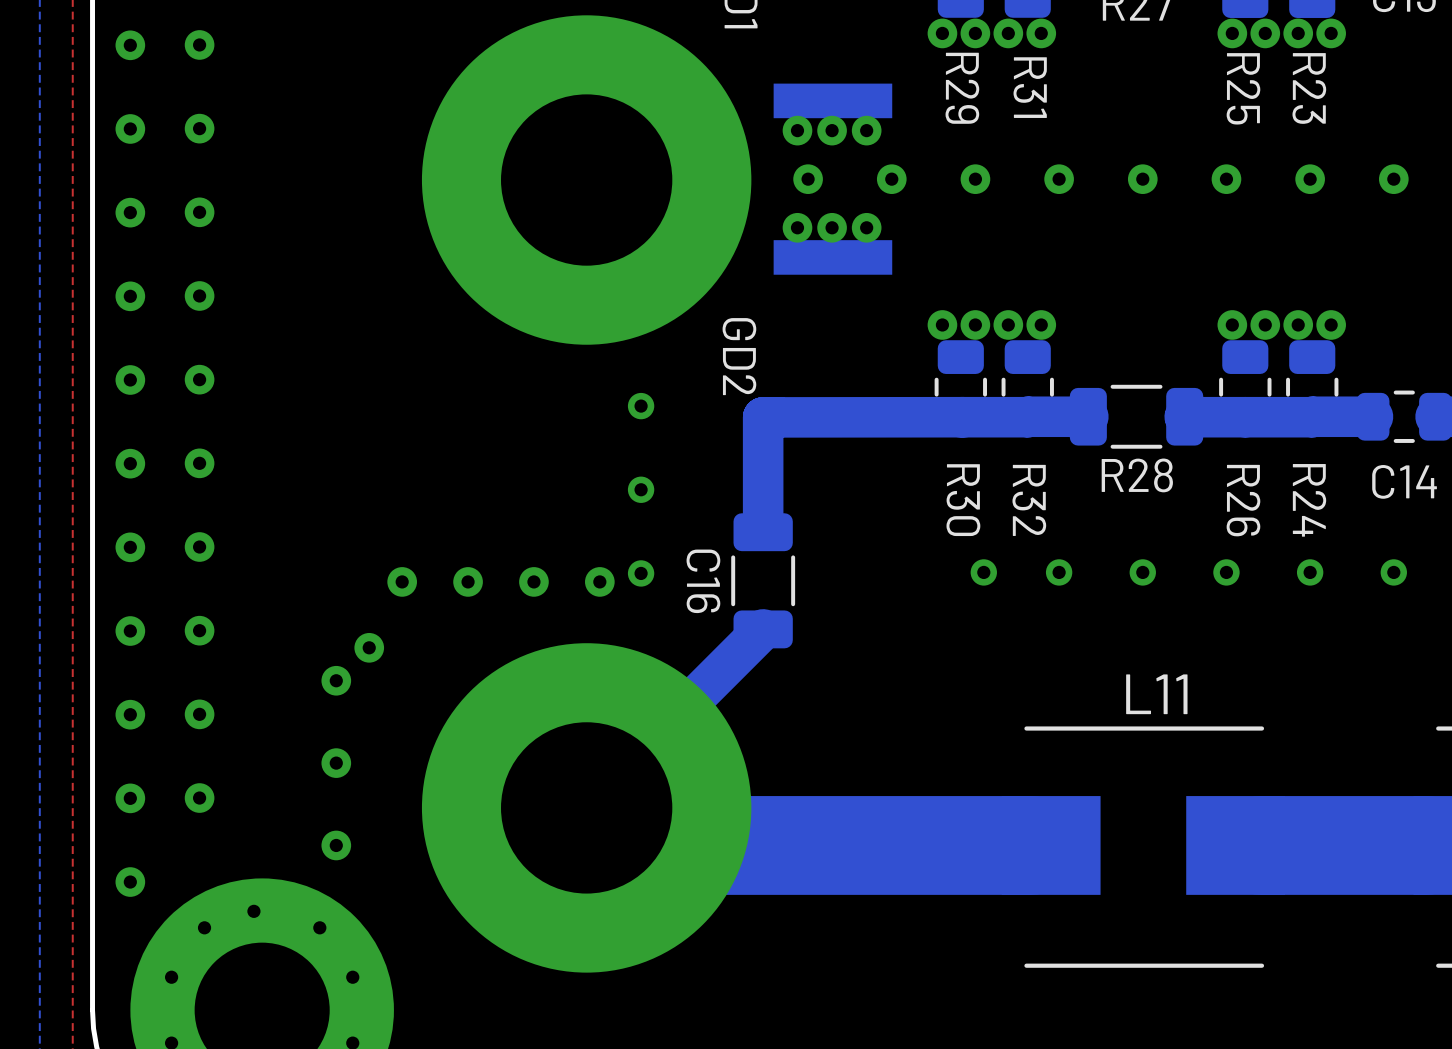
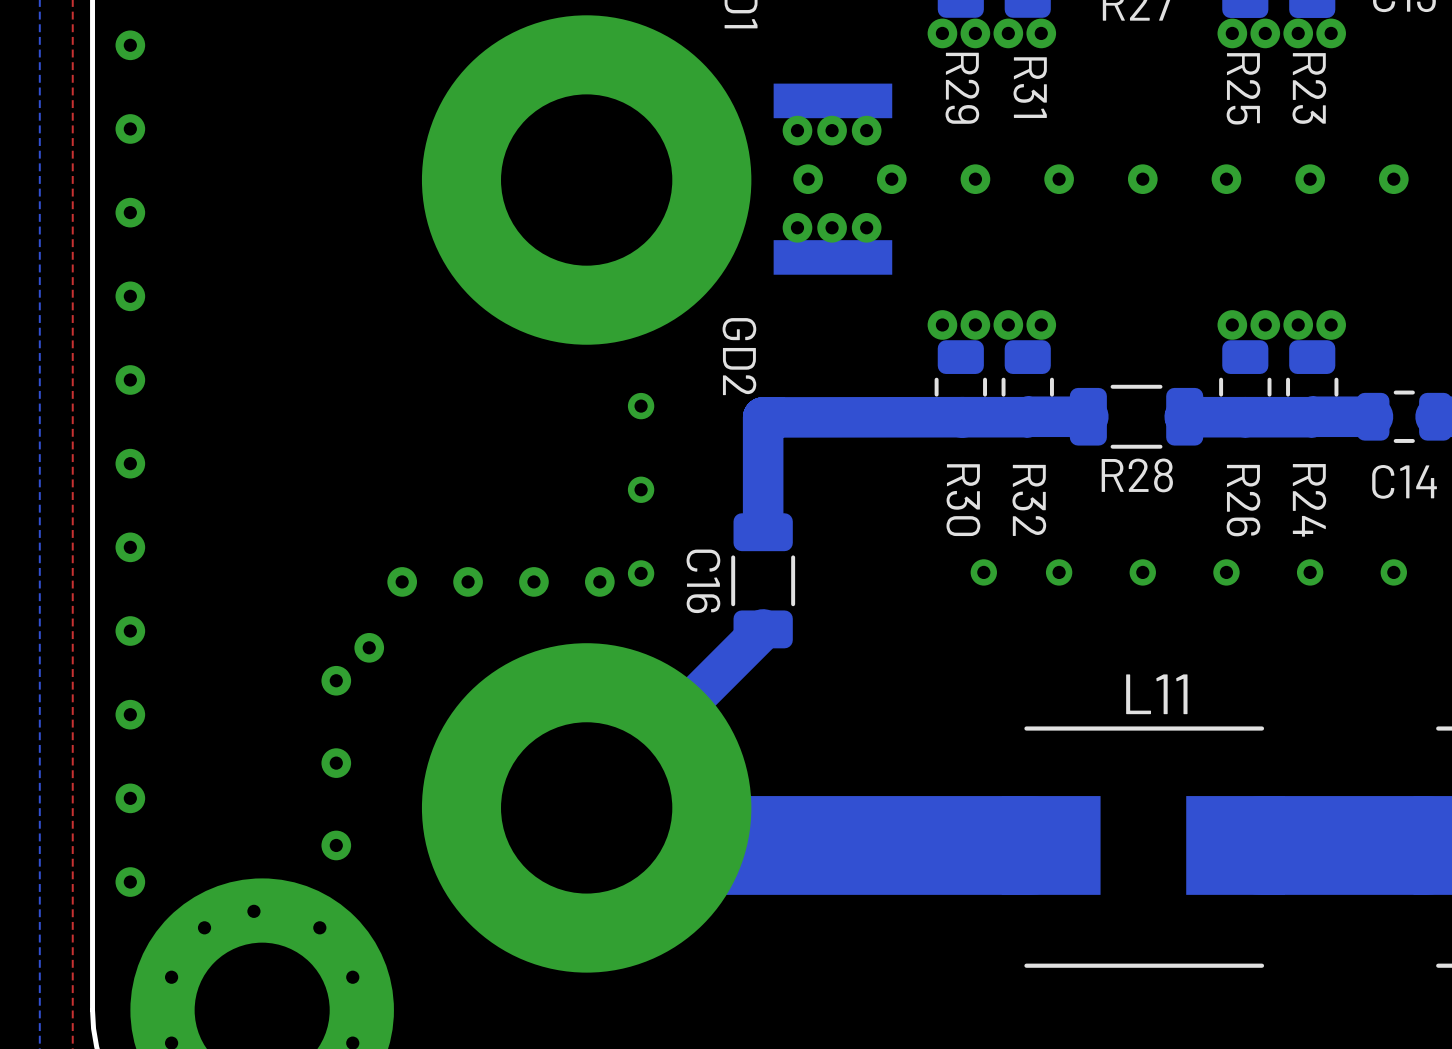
via: (199, 44) -> none
via: (199, 128) -> none
via: (199, 212) -> none
via: (199, 295) -> none
via: (199, 379) -> none
via: (199, 463) -> none
via: (199, 547) -> none
via: (199, 630) -> none
via: (199, 714) -> none
via: (199, 798) -> none

